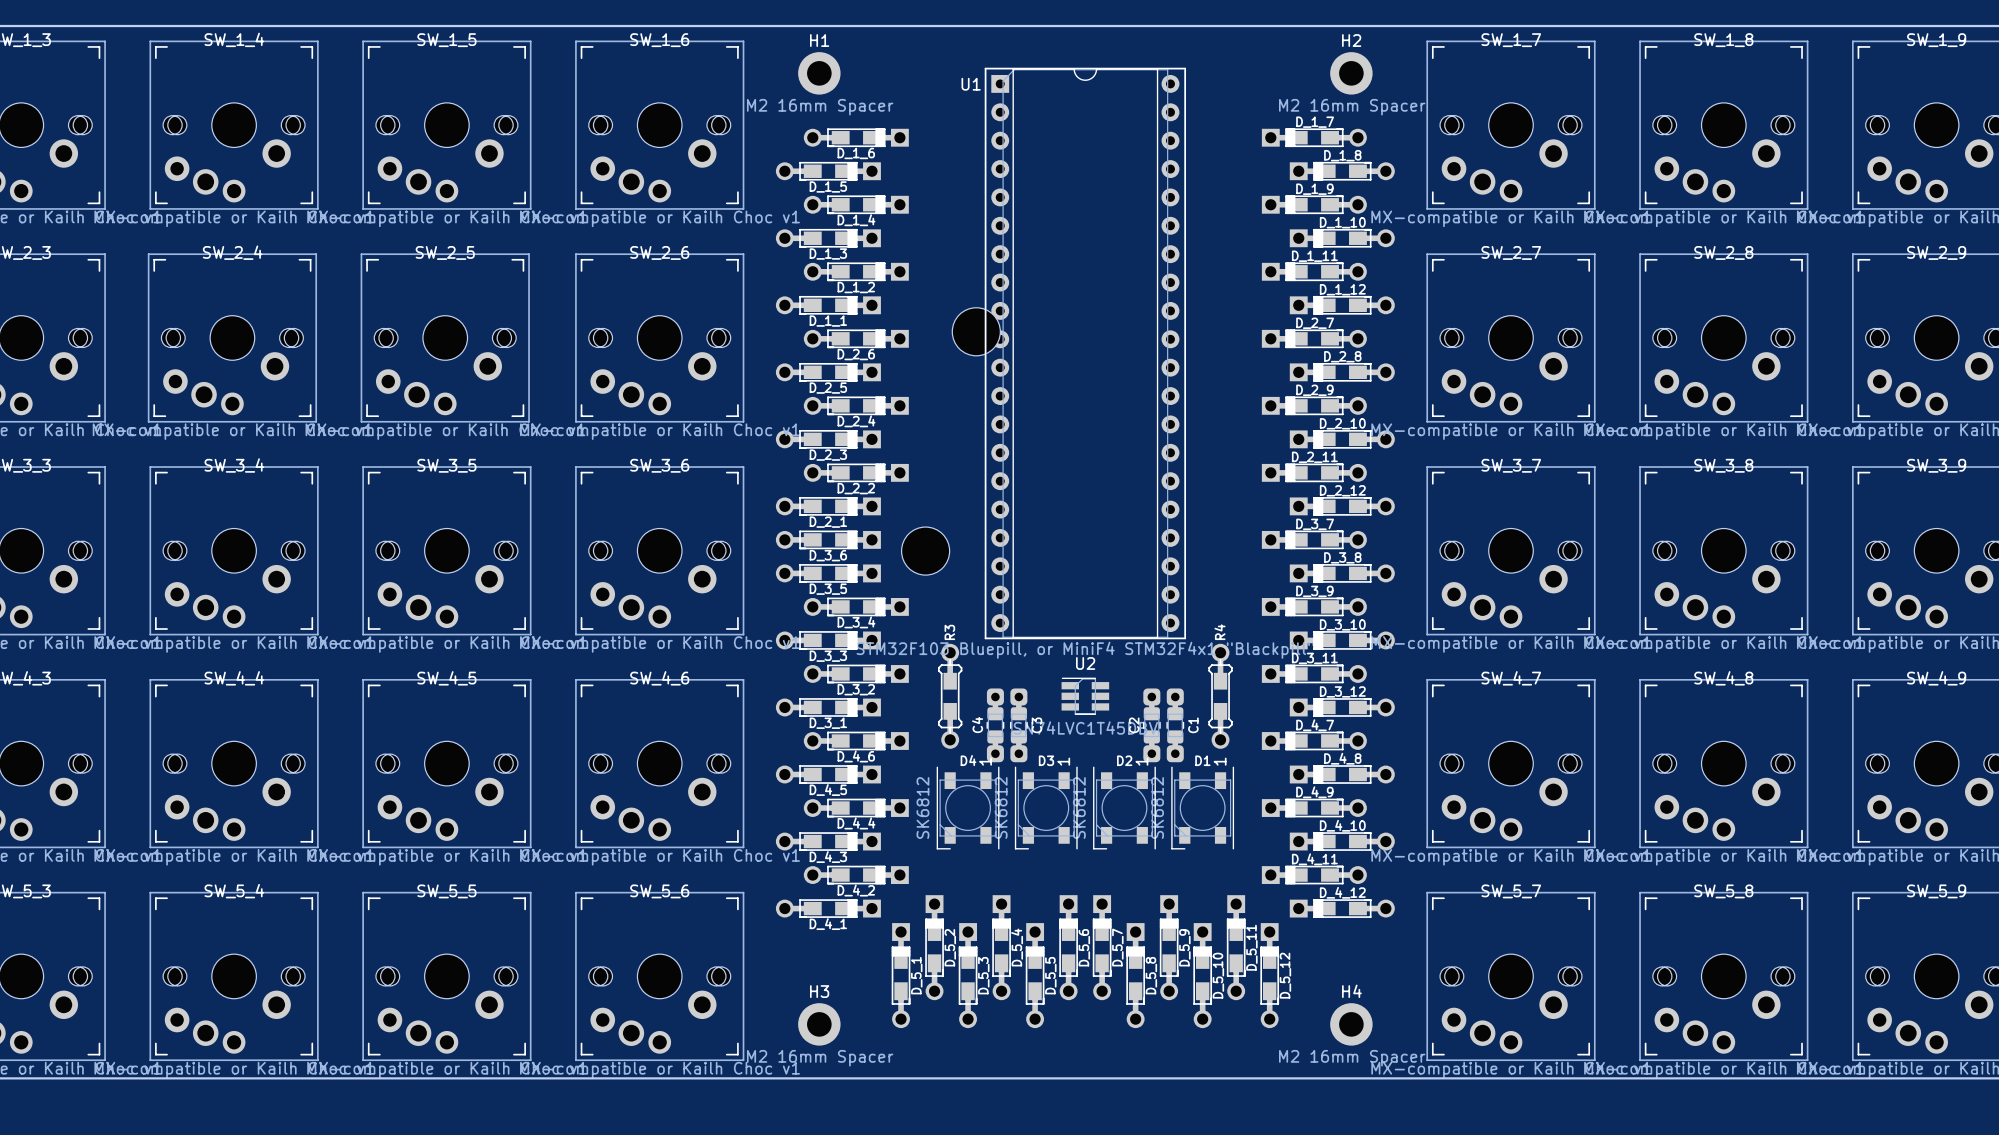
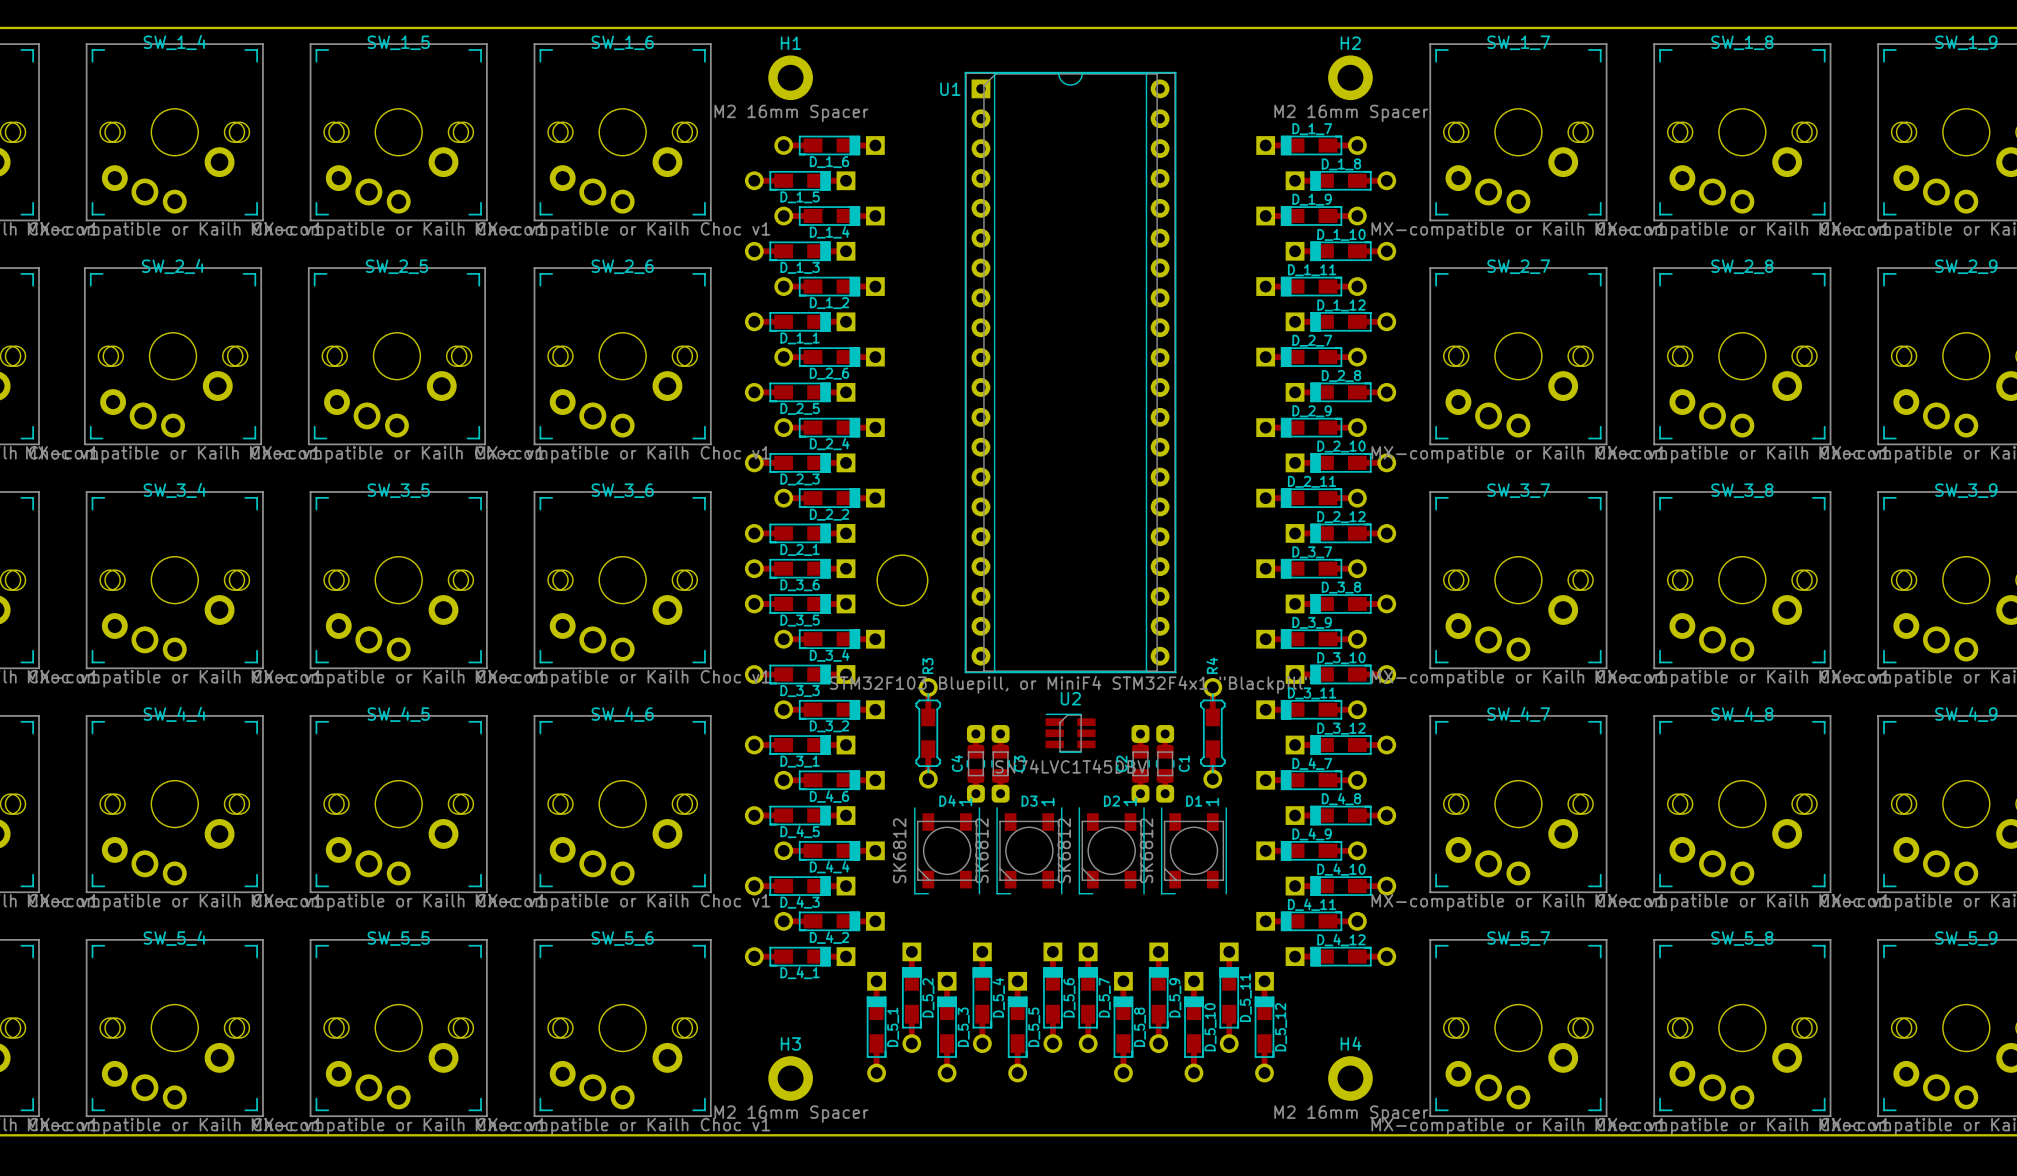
part: (976, 331) -> none

